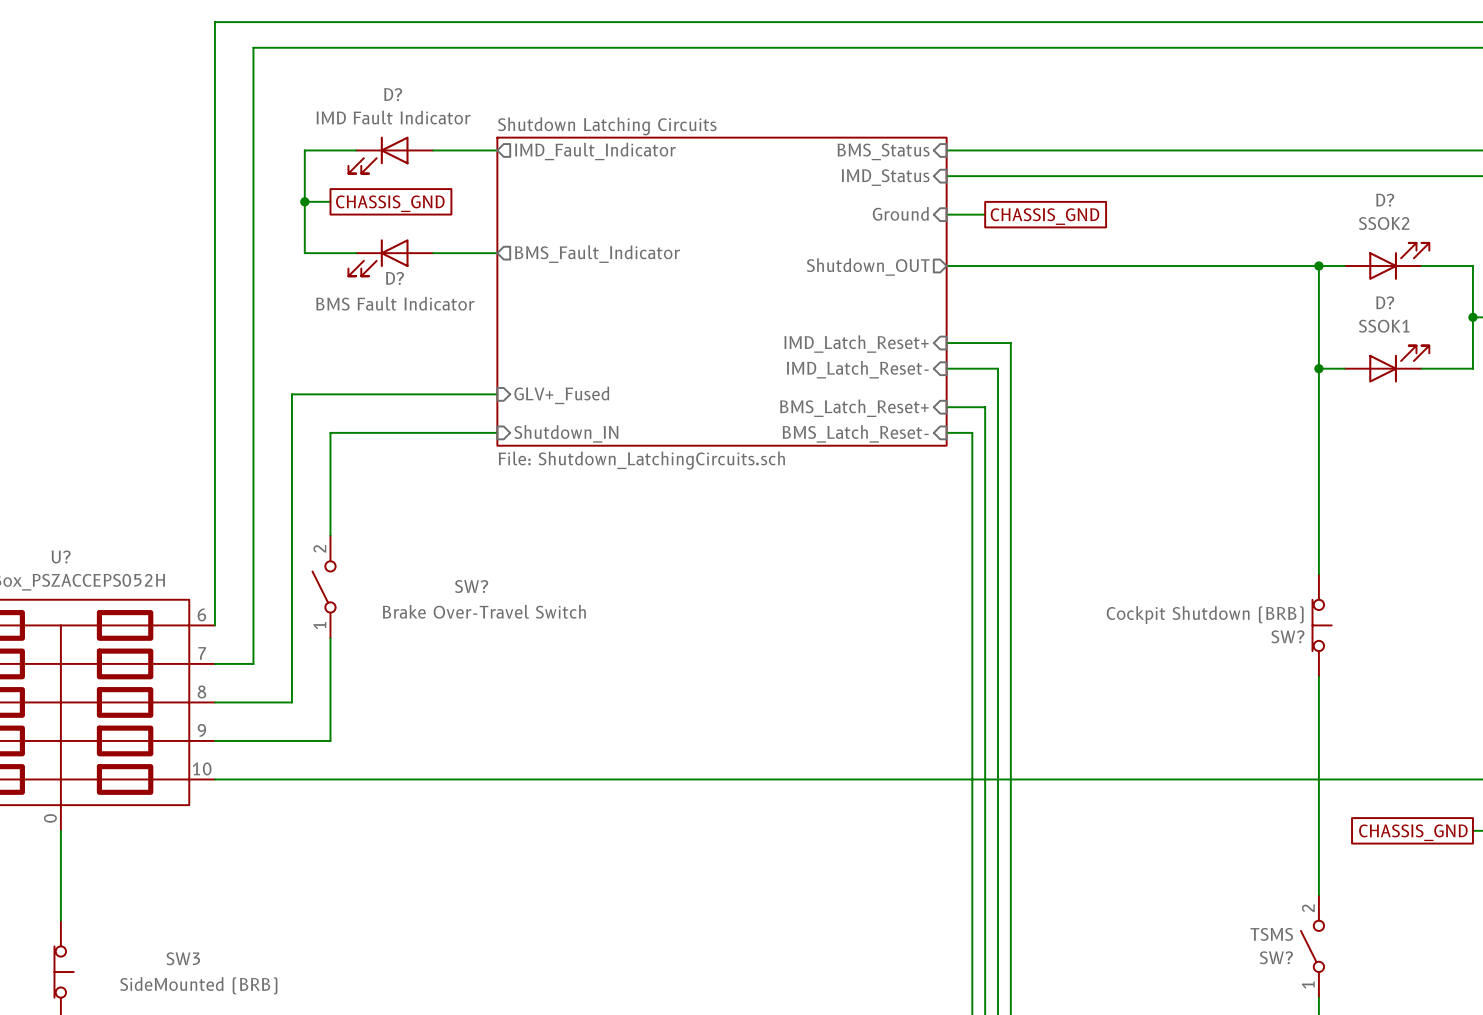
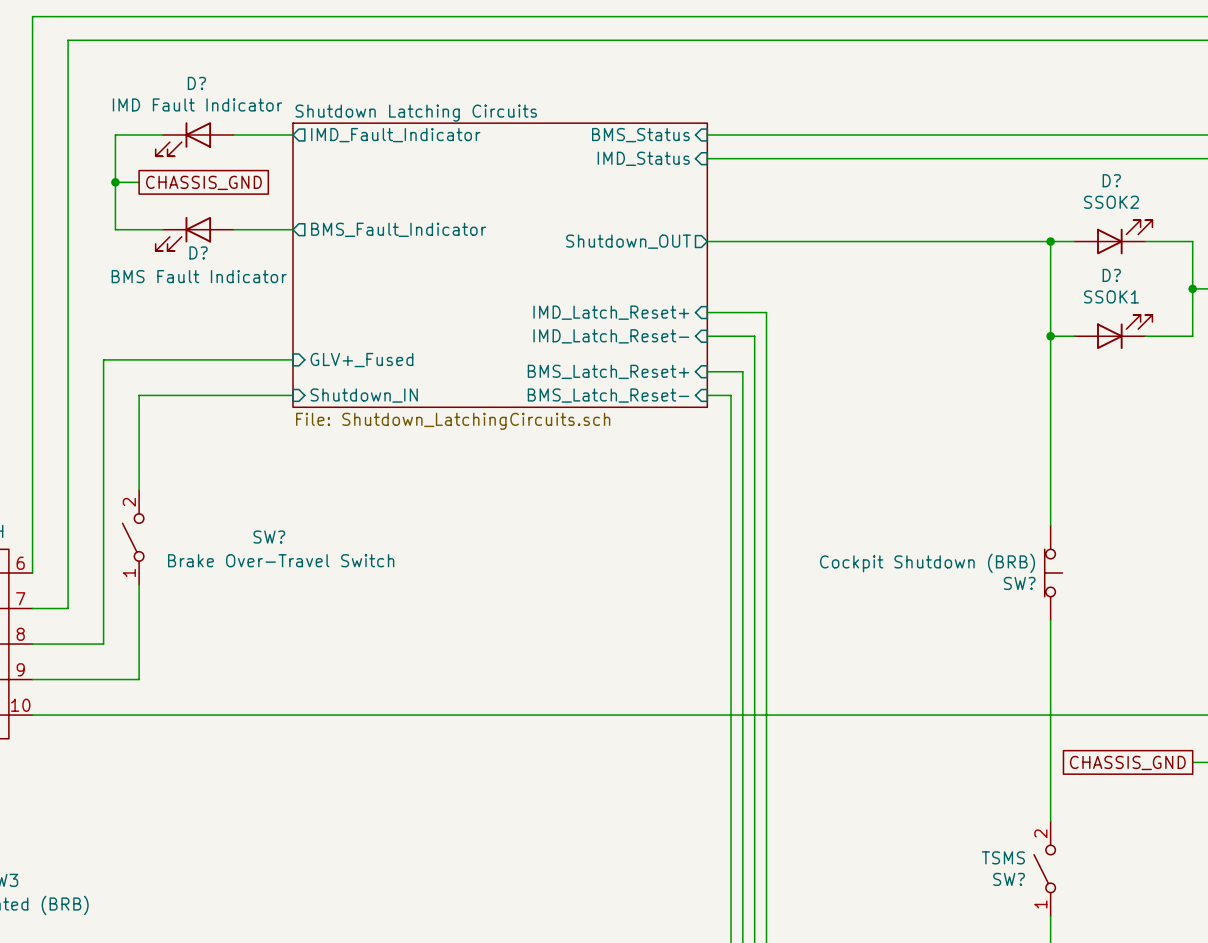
sheet pin: Ground (900, 213) -> none
wire: (946, 214) (985, 214) -> none
global label: CHASSIS_GND (1044, 216) -> none

